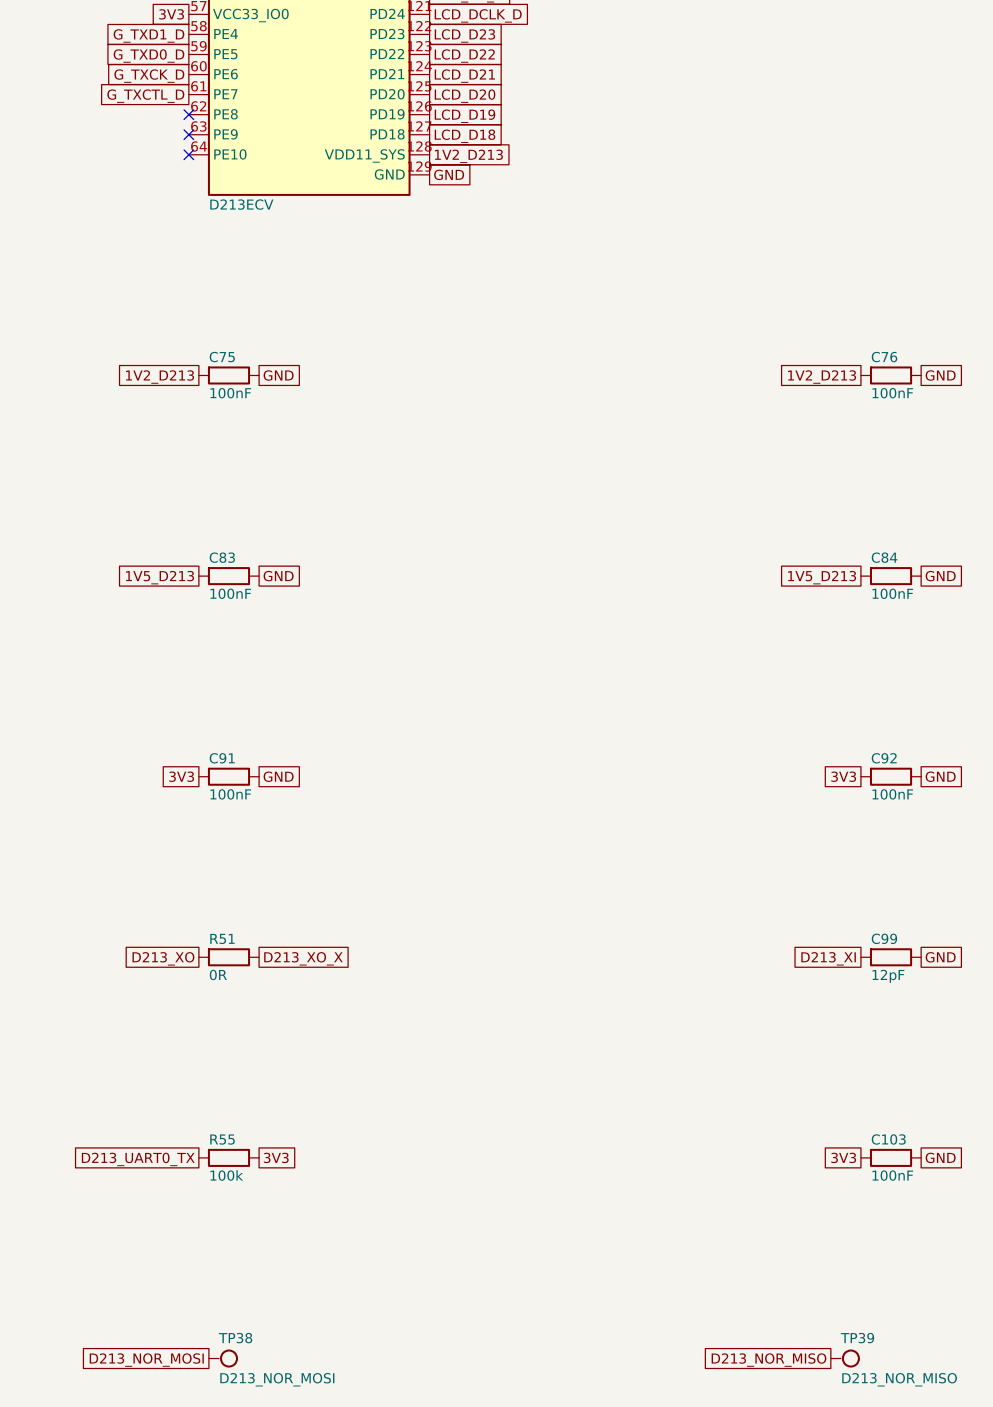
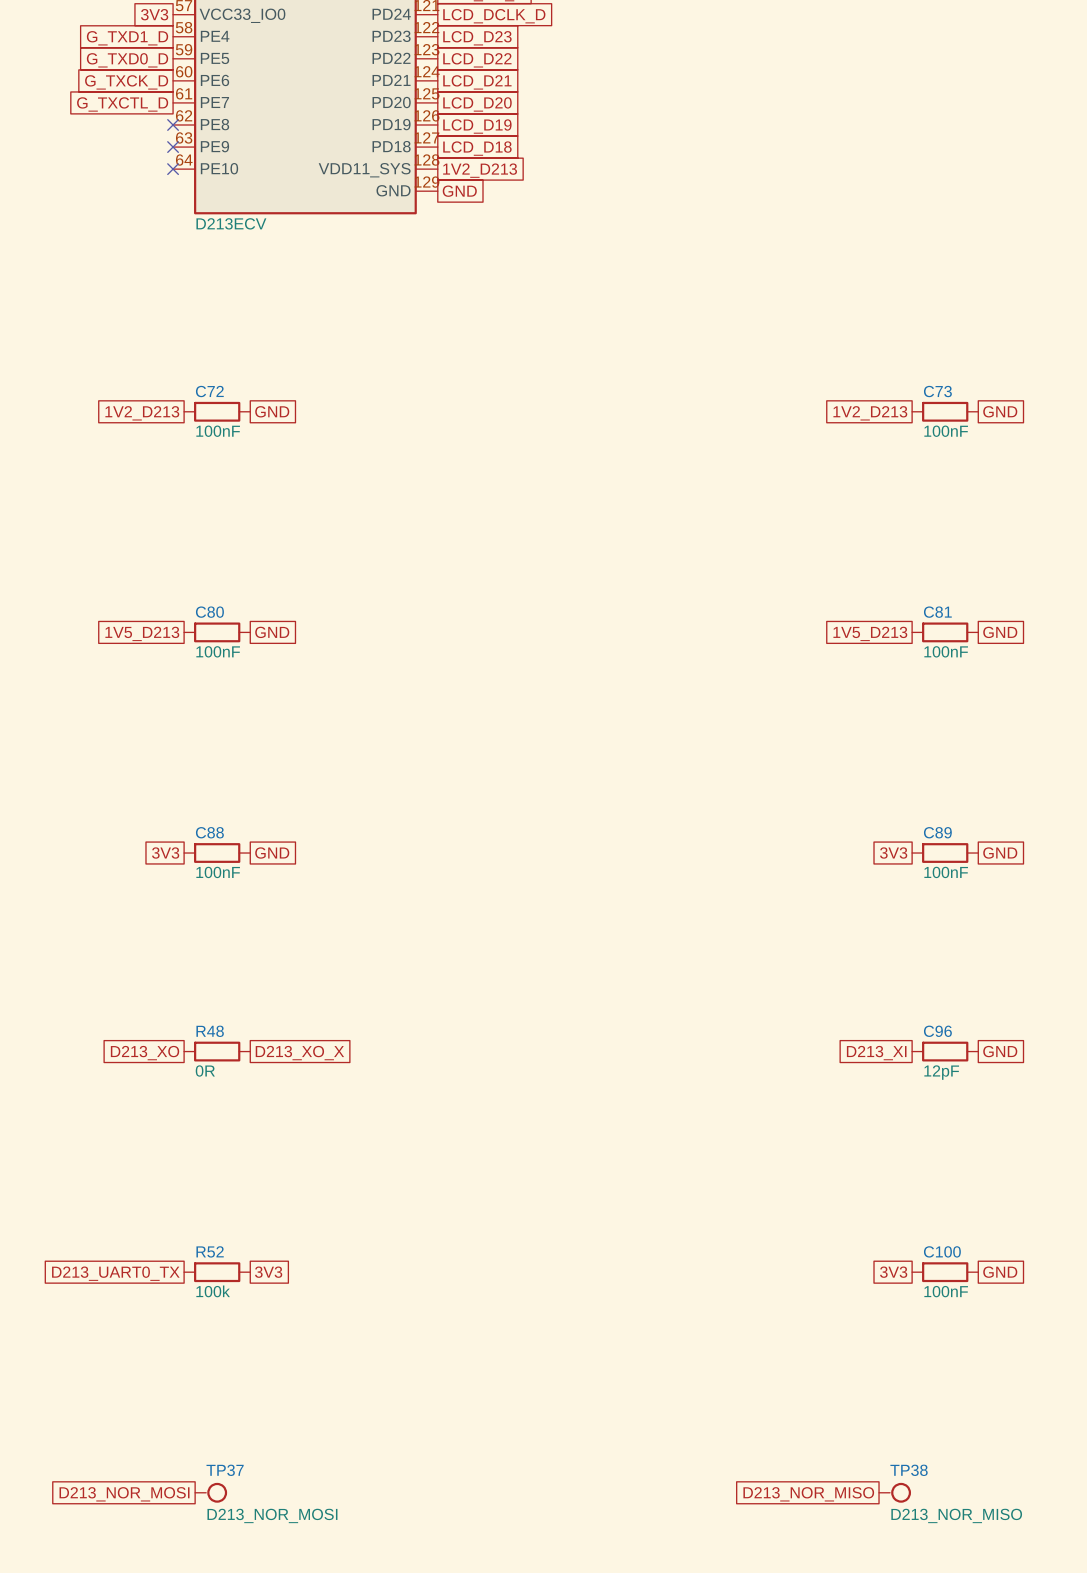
C75 name: C75 (222, 357) -> C72 (209, 391)
C76 name: C76 (884, 357) -> C73 (937, 391)
C83 name: C83 (222, 557) -> C80 (209, 612)
C84 name: C84 (884, 557) -> C81 (937, 612)
C91 name: C91 (222, 758) -> C88 (209, 832)
C92 name: C92 (884, 758) -> C89 (937, 832)
R51 name: R51 (222, 938) -> R48 (210, 1031)
C99 name: C99 (884, 938) -> C96 (937, 1031)
R55 name: R55 (222, 1139) -> R52 (210, 1251)
C103 name: C103 (888, 1139) -> C100 (942, 1251)
TP38 name: TP38 (235, 1338) -> TP37 (225, 1470)
TP39 name: TP39 (857, 1338) -> TP38 (909, 1470)

